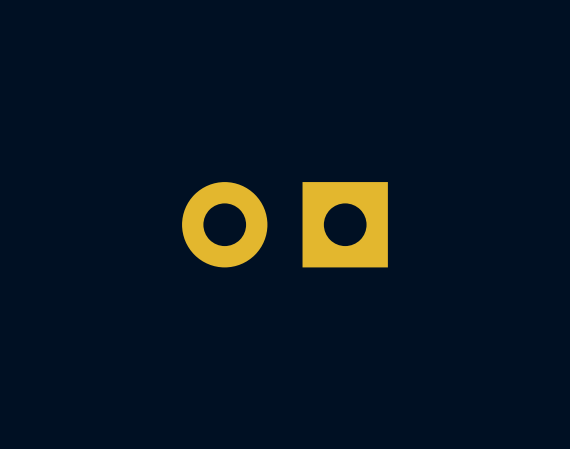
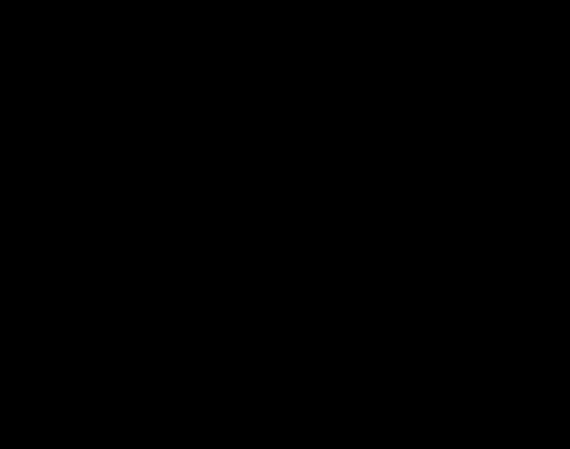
part: (284, 224) -> none

